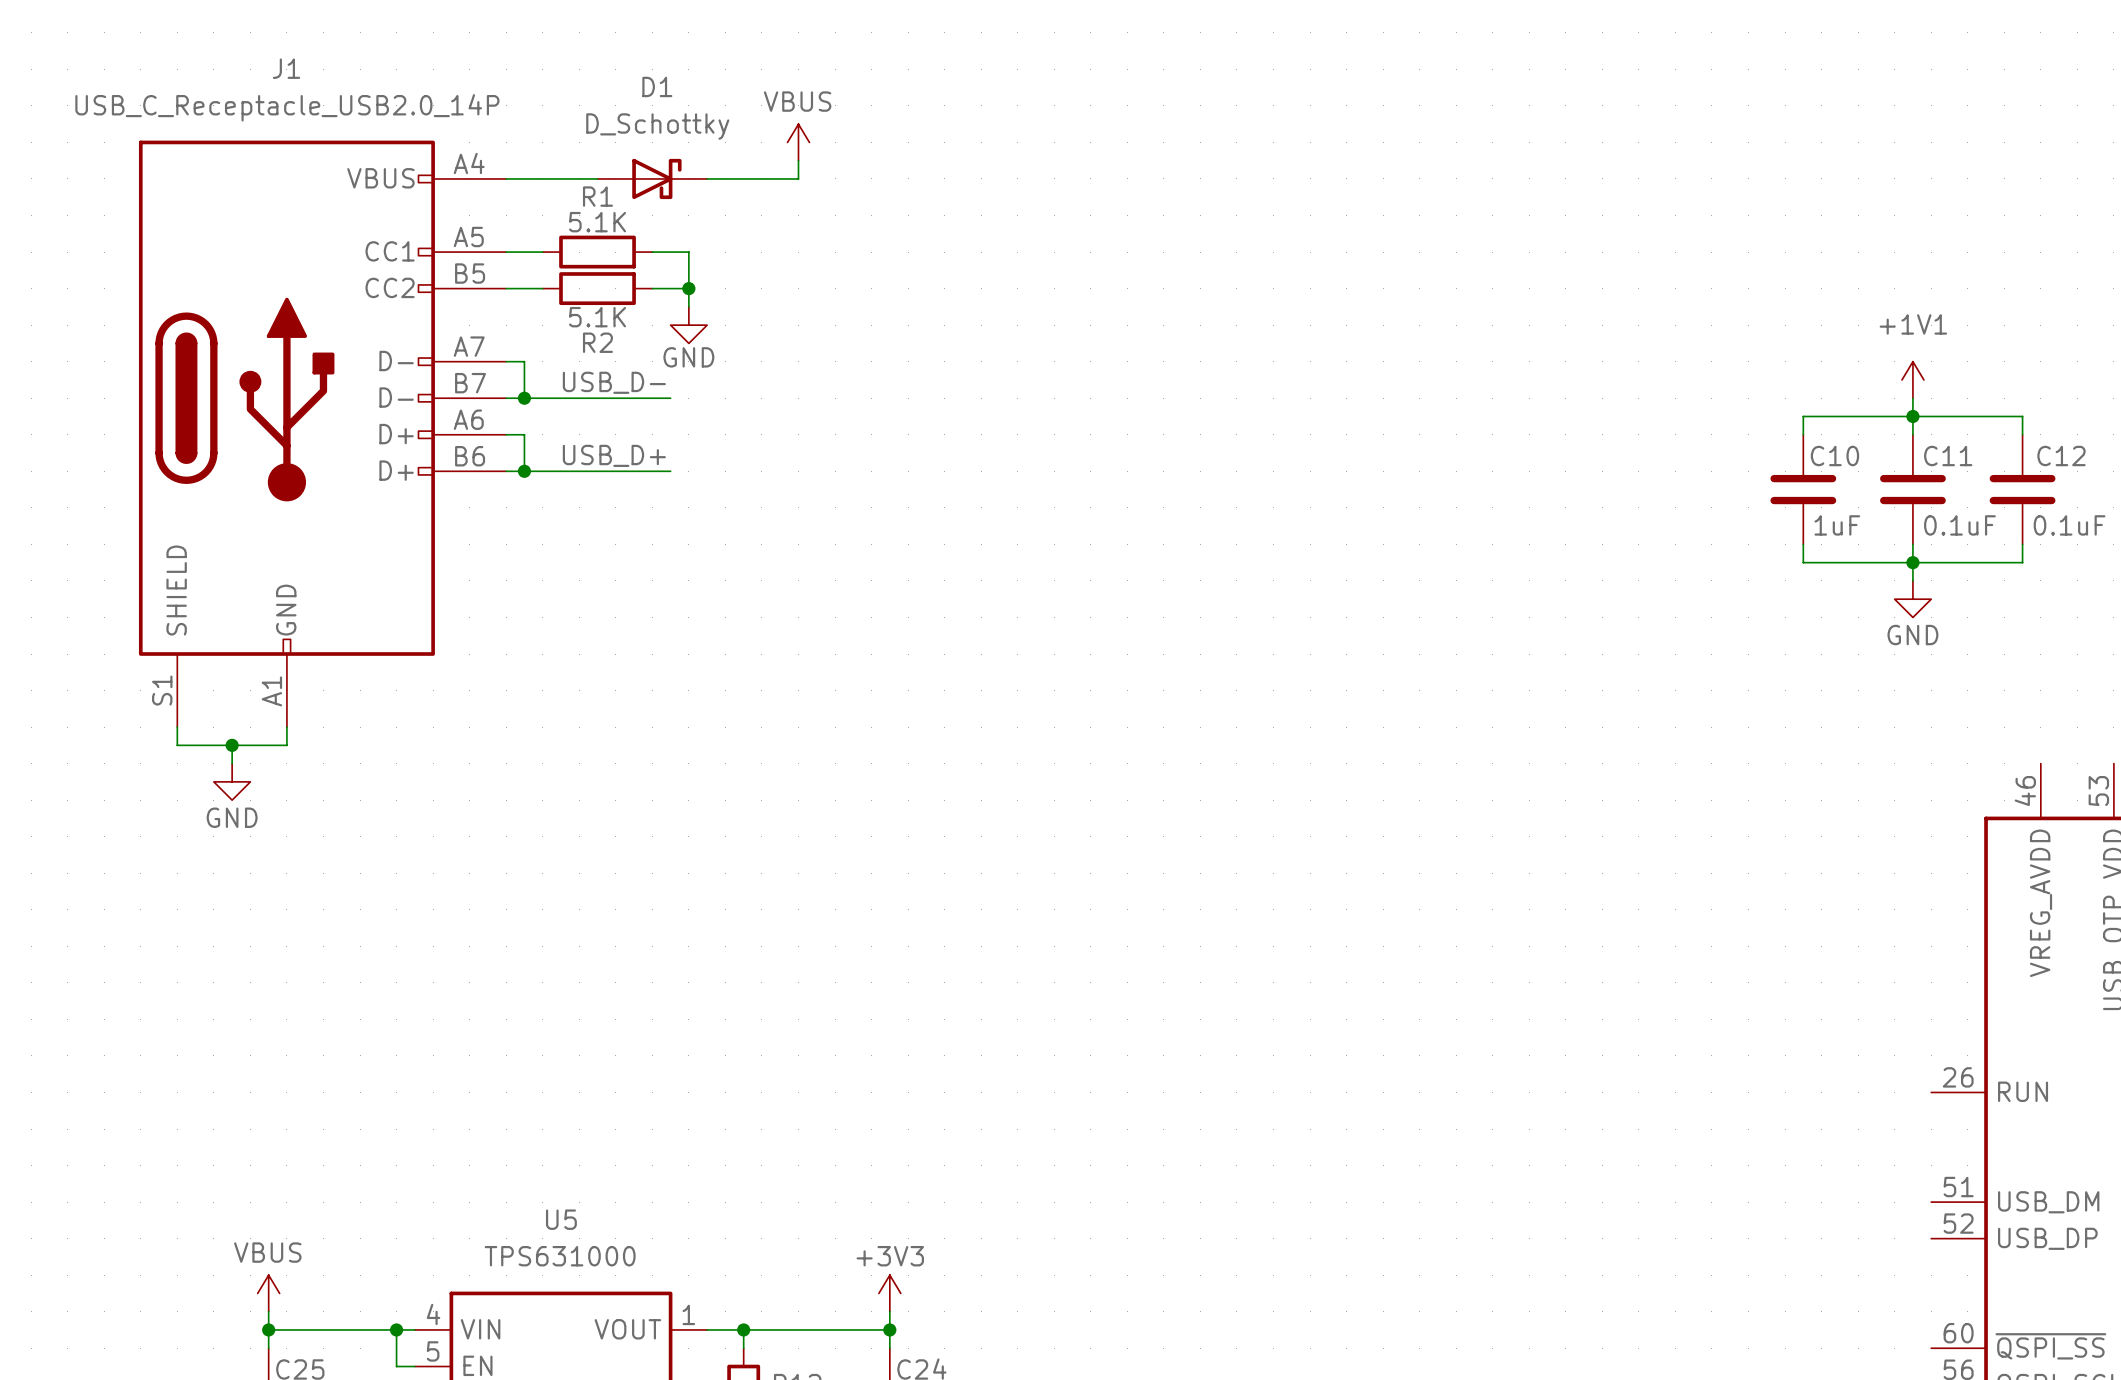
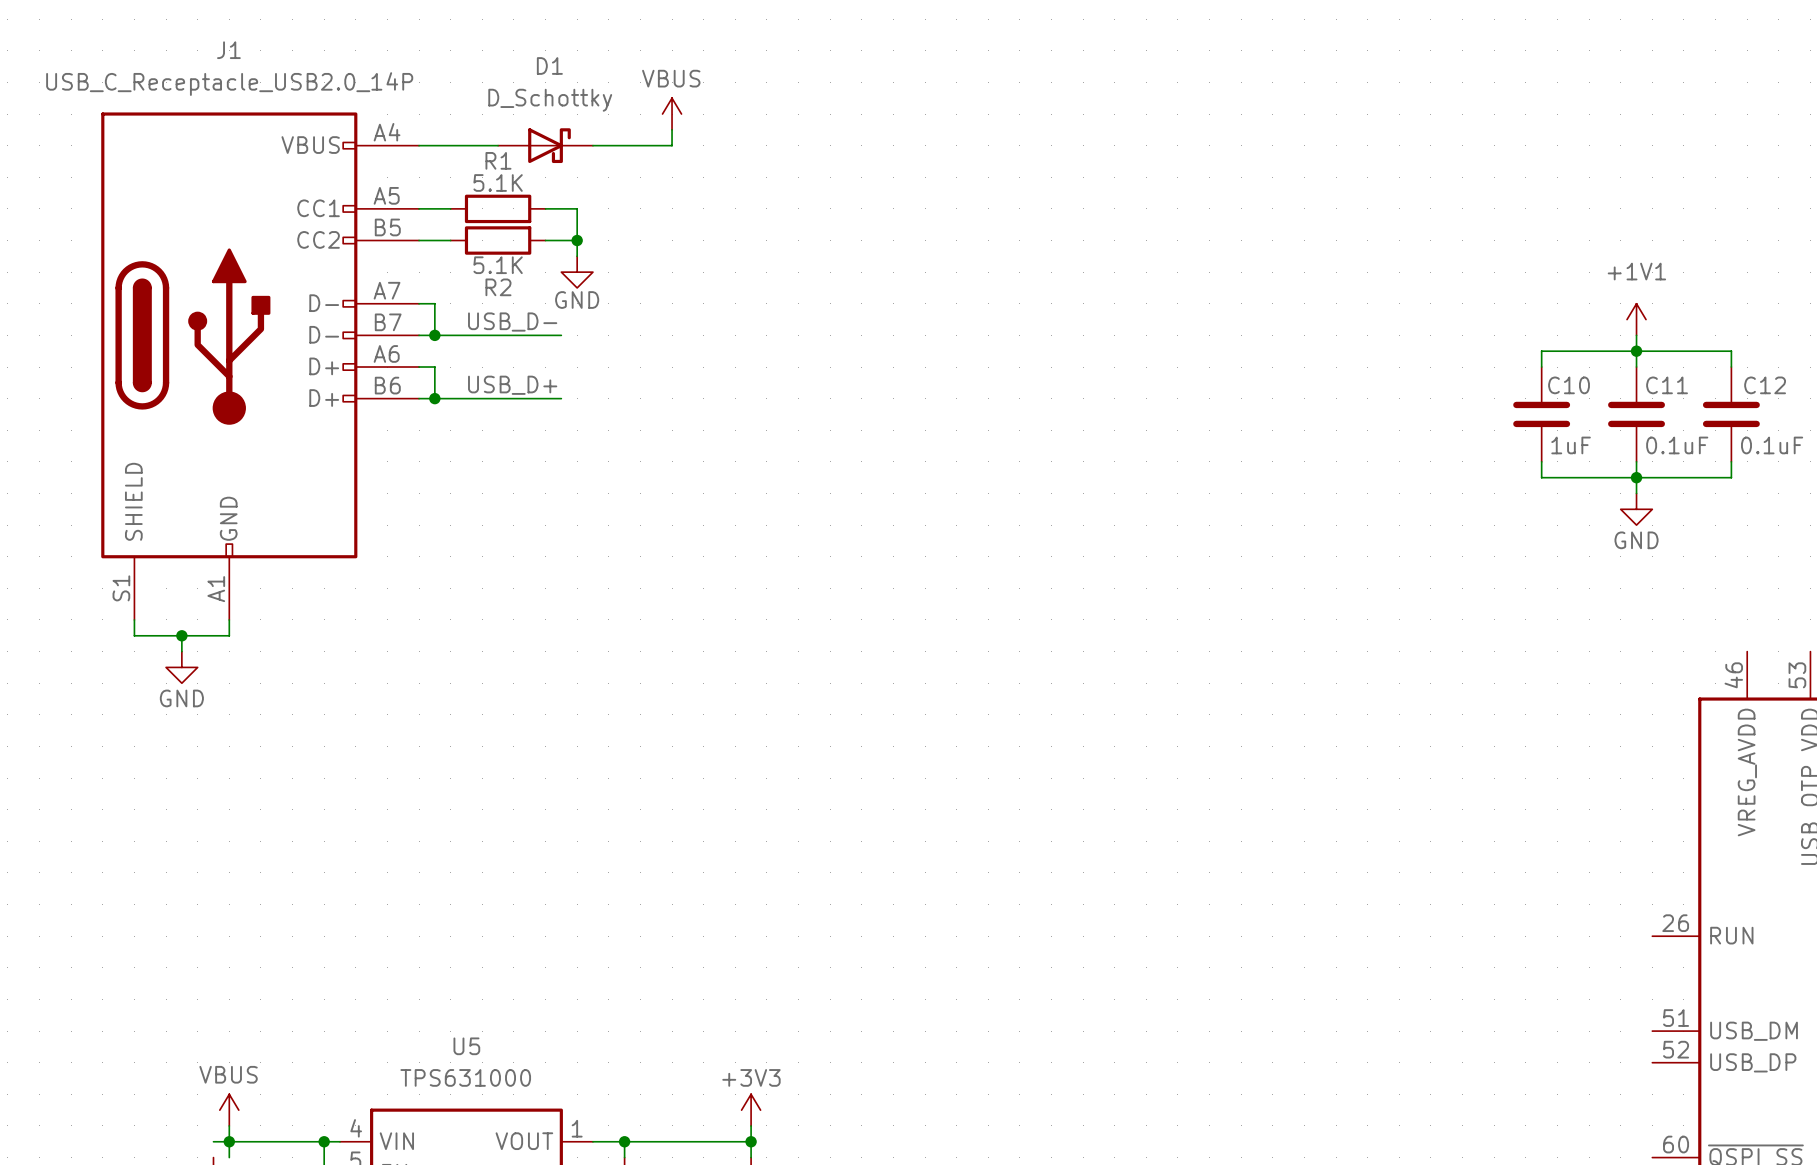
power symbol position: VBUS (268, 1293) -> VBUS (229, 1110)
wire: (268, 1311) (268, 1348) -> (229, 1125) (229, 1157)
junction position: (268, 1329) -> (229, 1141)

